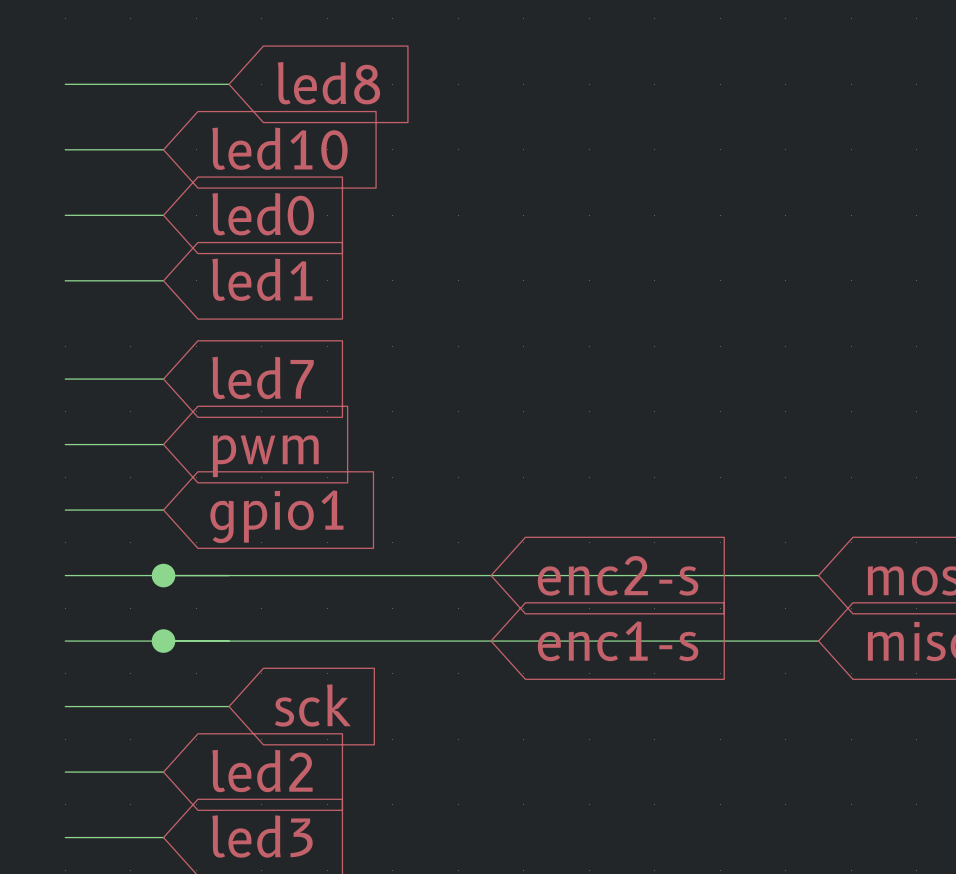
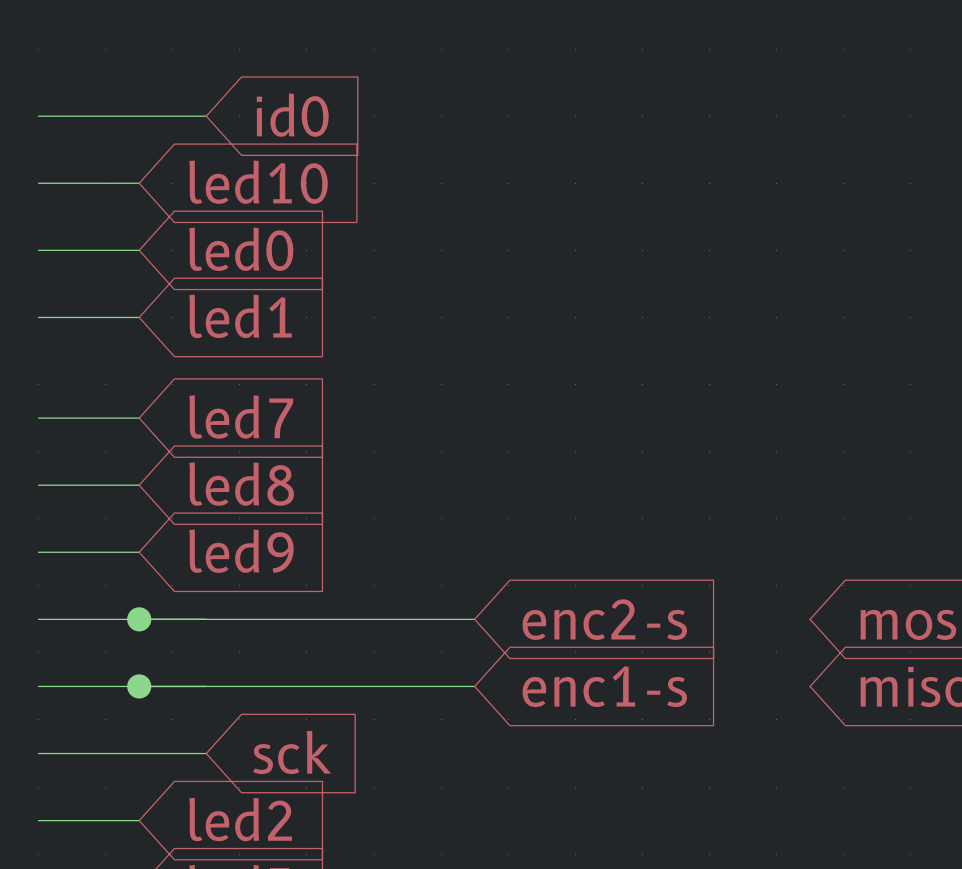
global label: led8 (328, 83) -> id0 (292, 115)
global label: pwm (265, 456) -> led8 (241, 484)
global label: gpio1 (276, 516) -> led9 (241, 551)
wire: (491, 575) (818, 575) -> none
wire: (491, 641) (818, 641) -> none

